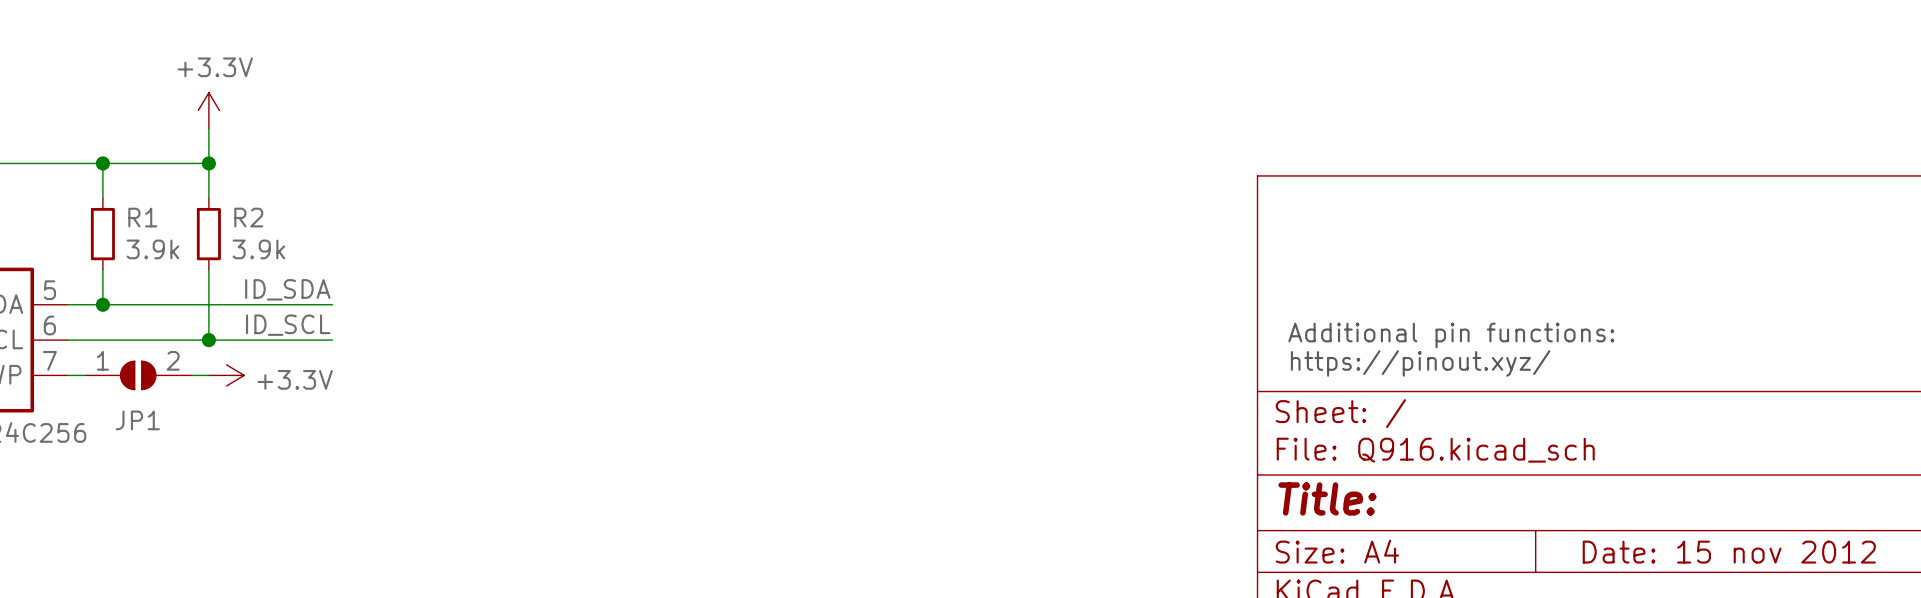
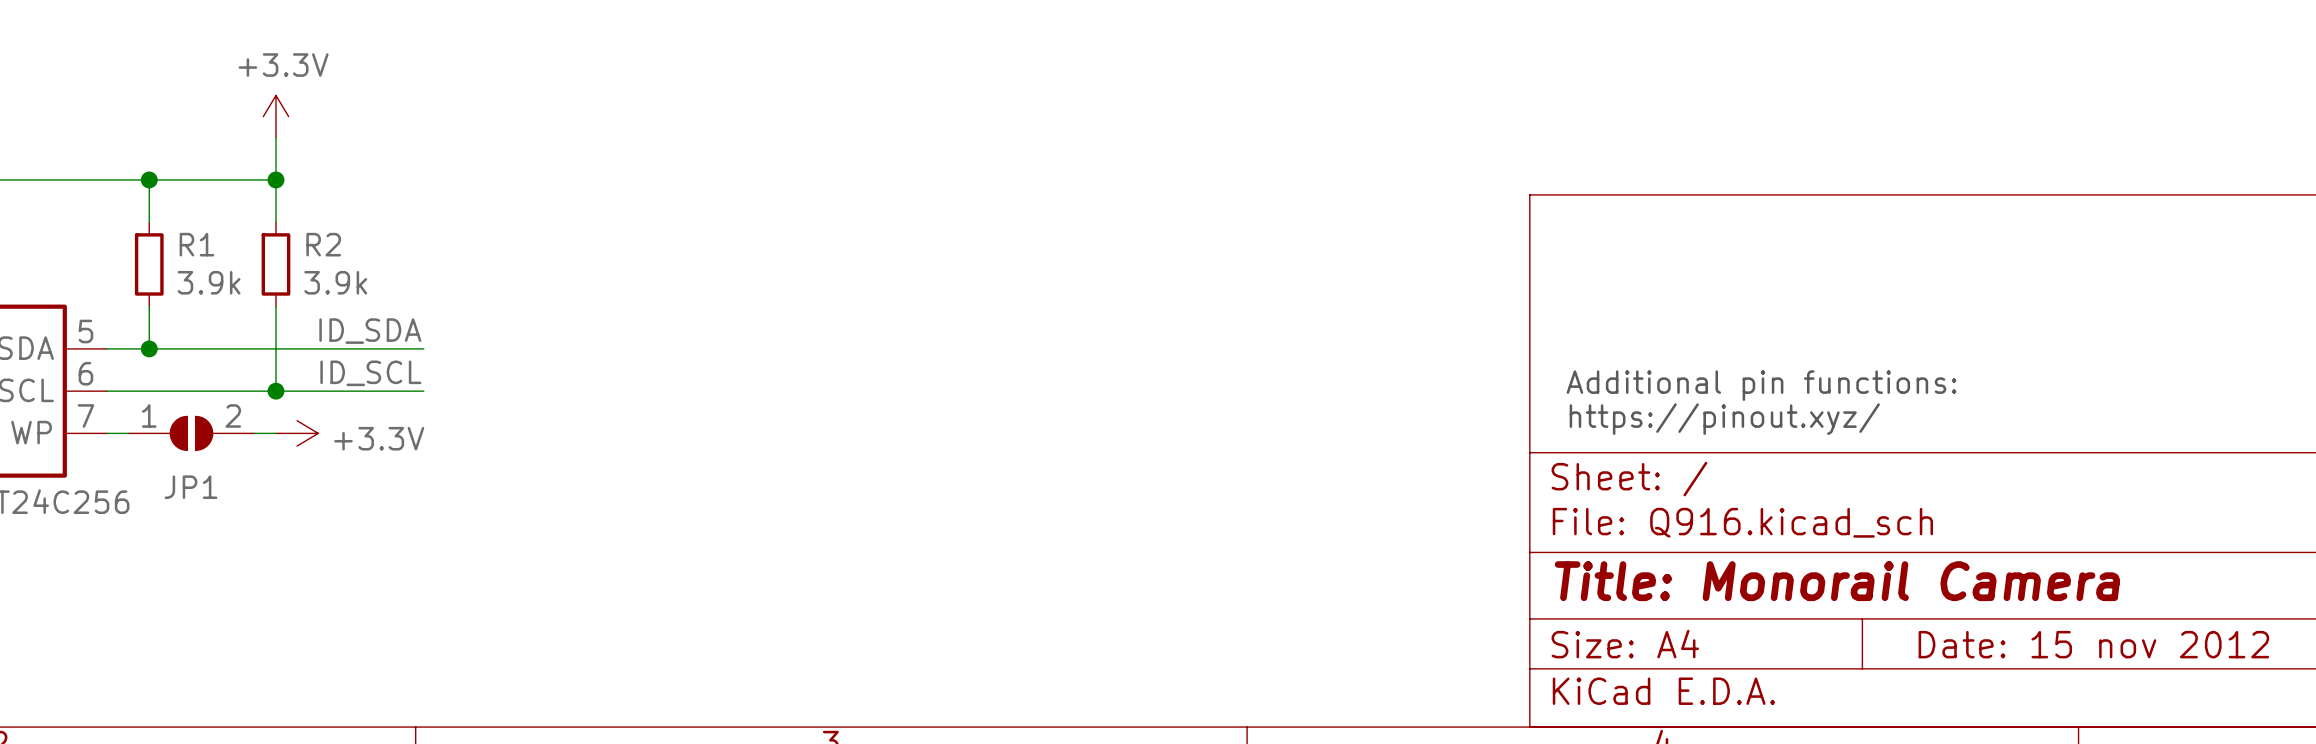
title block: Title: (1327, 498) -> Title: Monorail Camera (1837, 581)

